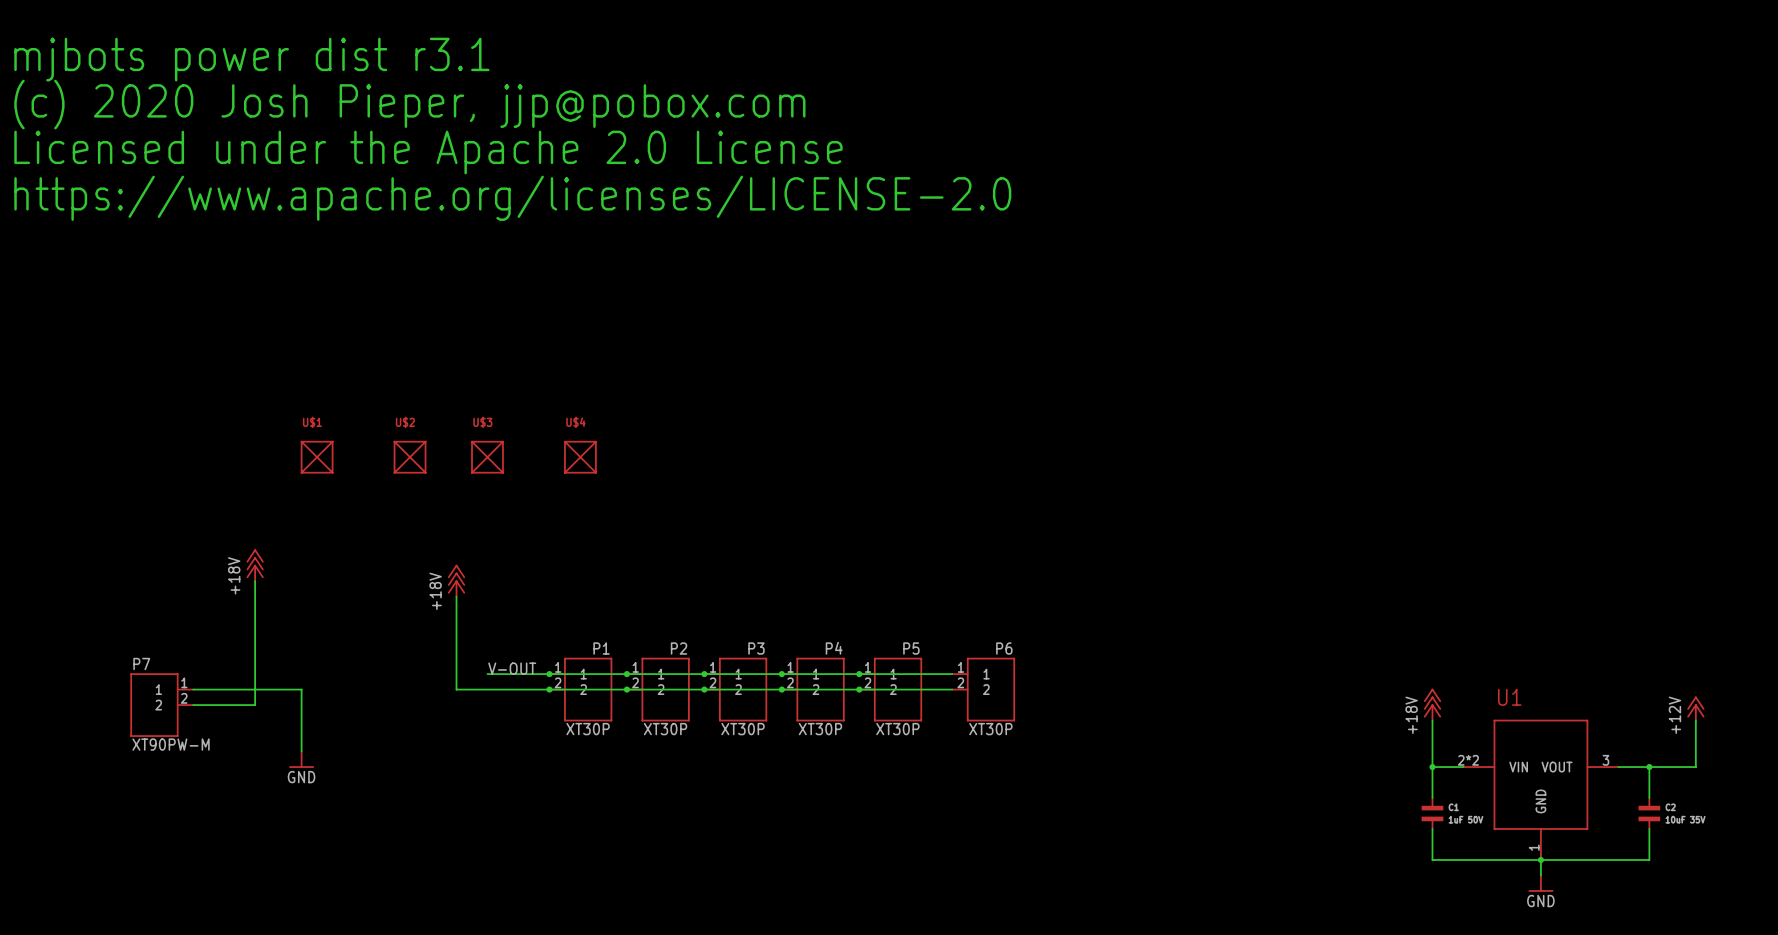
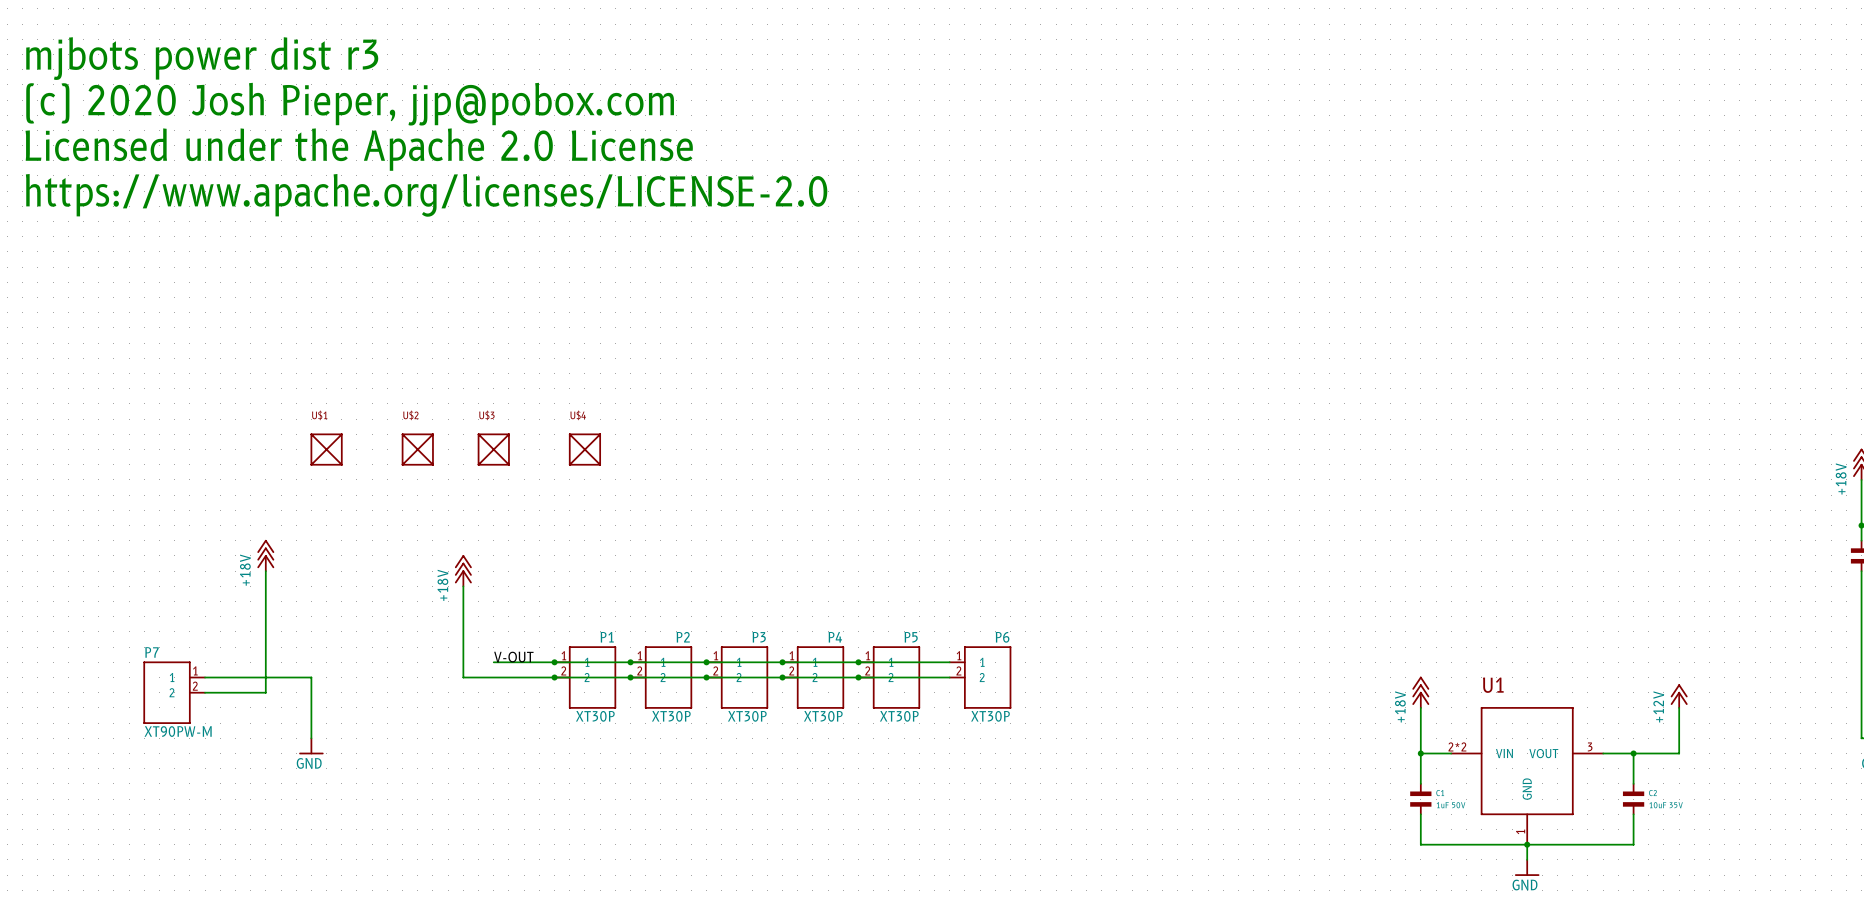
text: mjbots power dist r3.1 (251, 59) -> mjbots power dist r3 (202, 58)

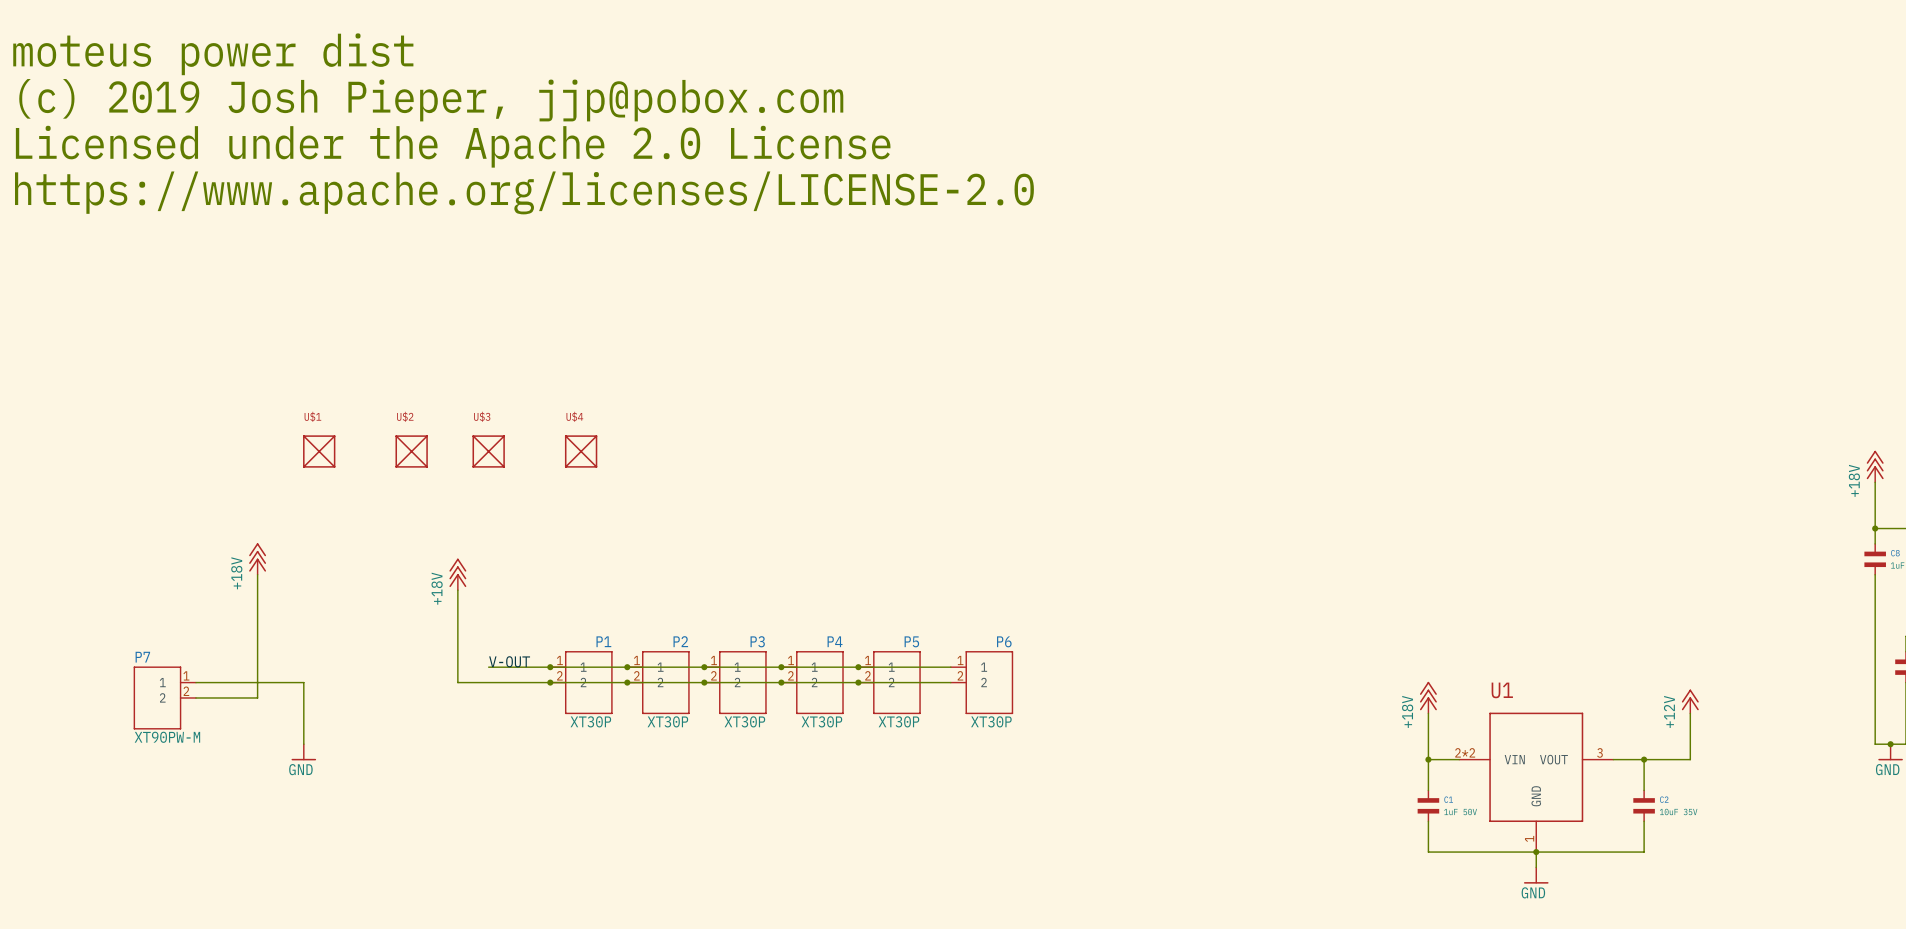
text: mjbots power dist r3 (202, 58) -> moteus power dist (213, 54)
text: (c) 2020 Josh Pieper, jjp@pobox.com (350, 104) -> (c) 2019 Josh Pieper, jjp@pobox.com (431, 100)

